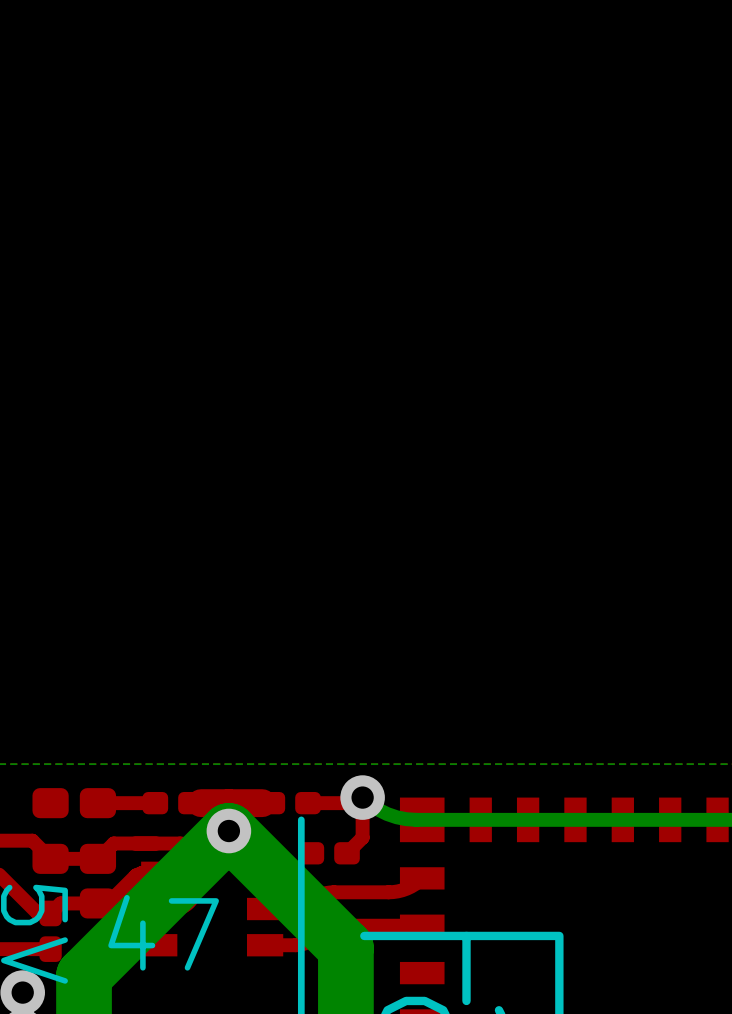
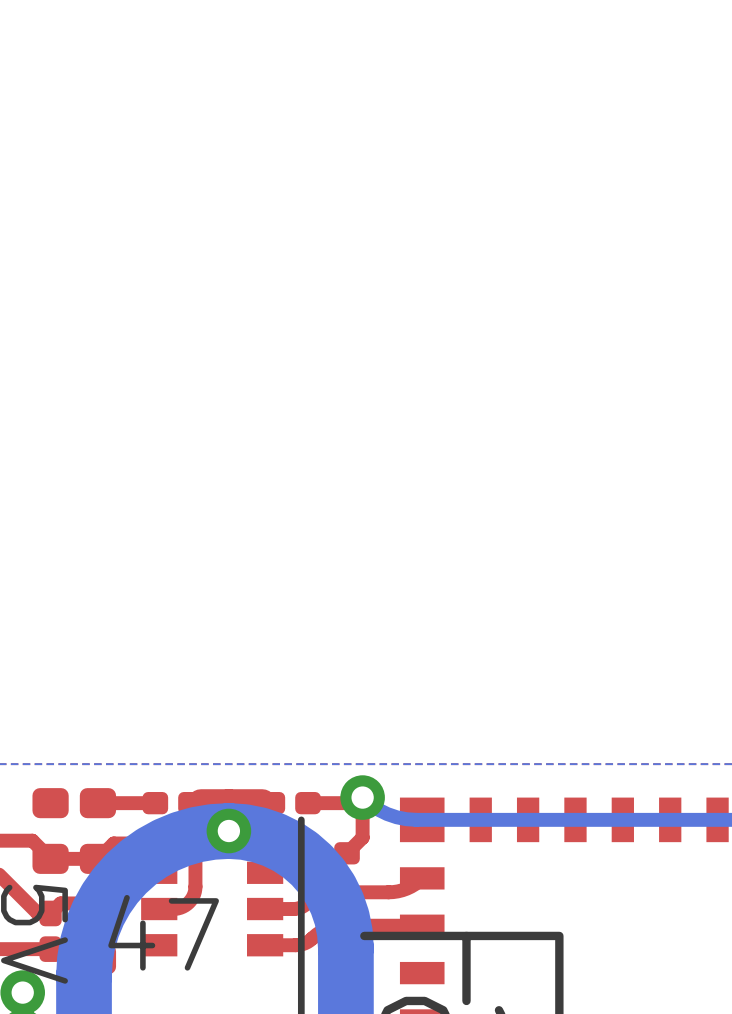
bottom track: (345, 948) (228, 831) (84, 975) -> (345, 948) (341, 917) (336, 903) (321, 876) (300, 855) (287, 846) (259, 834) (244, 832) (212, 831) (181, 839) (151, 853) (126, 873) (115, 885) (98, 913) (92, 928) (84, 959) (84, 975)

